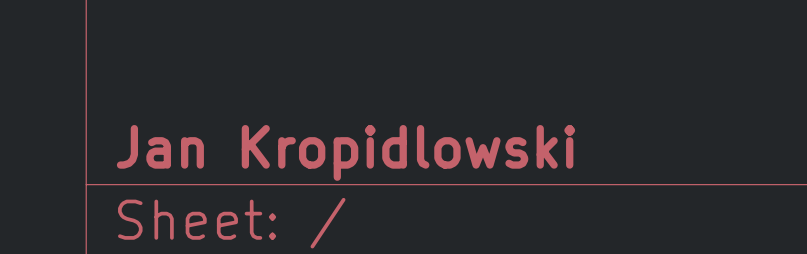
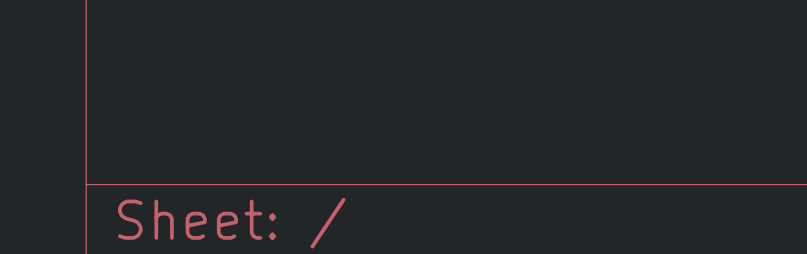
title block: Jan Kropidlowski (345, 152) -> none

